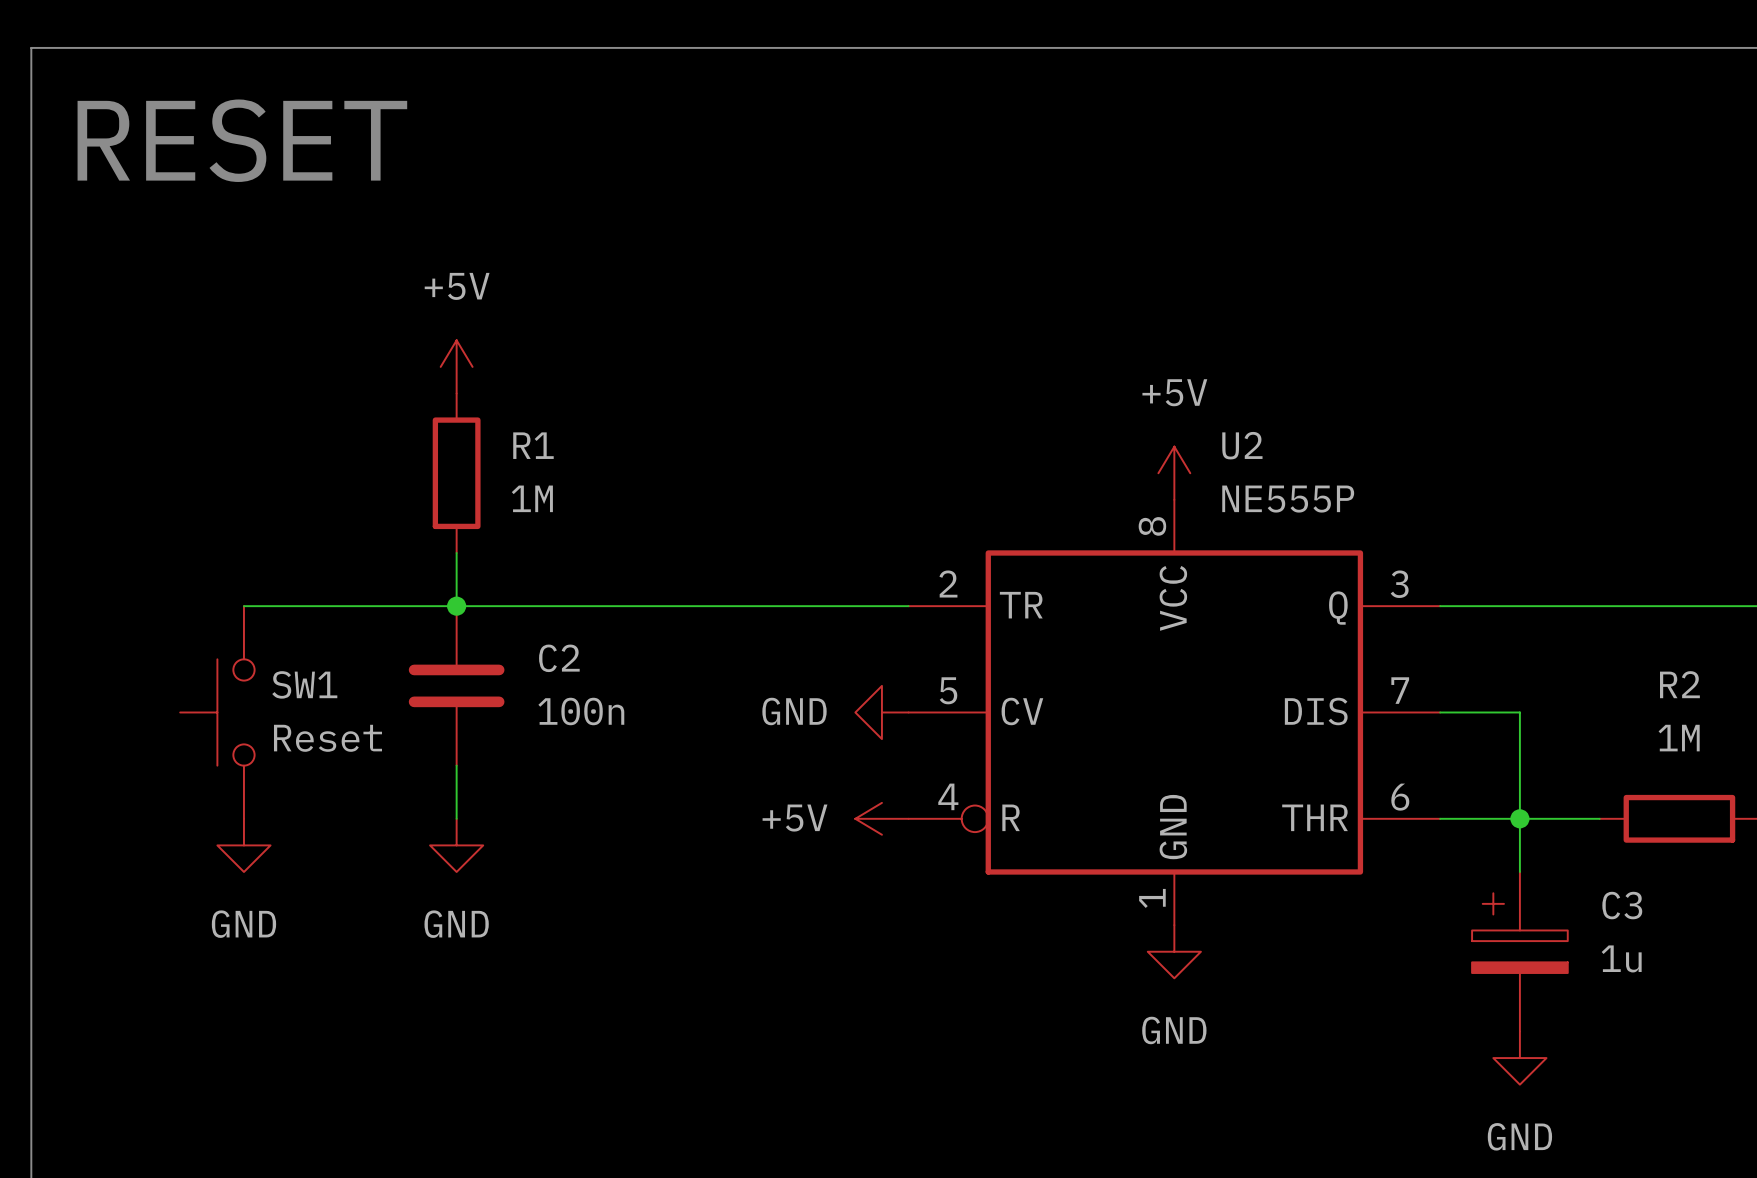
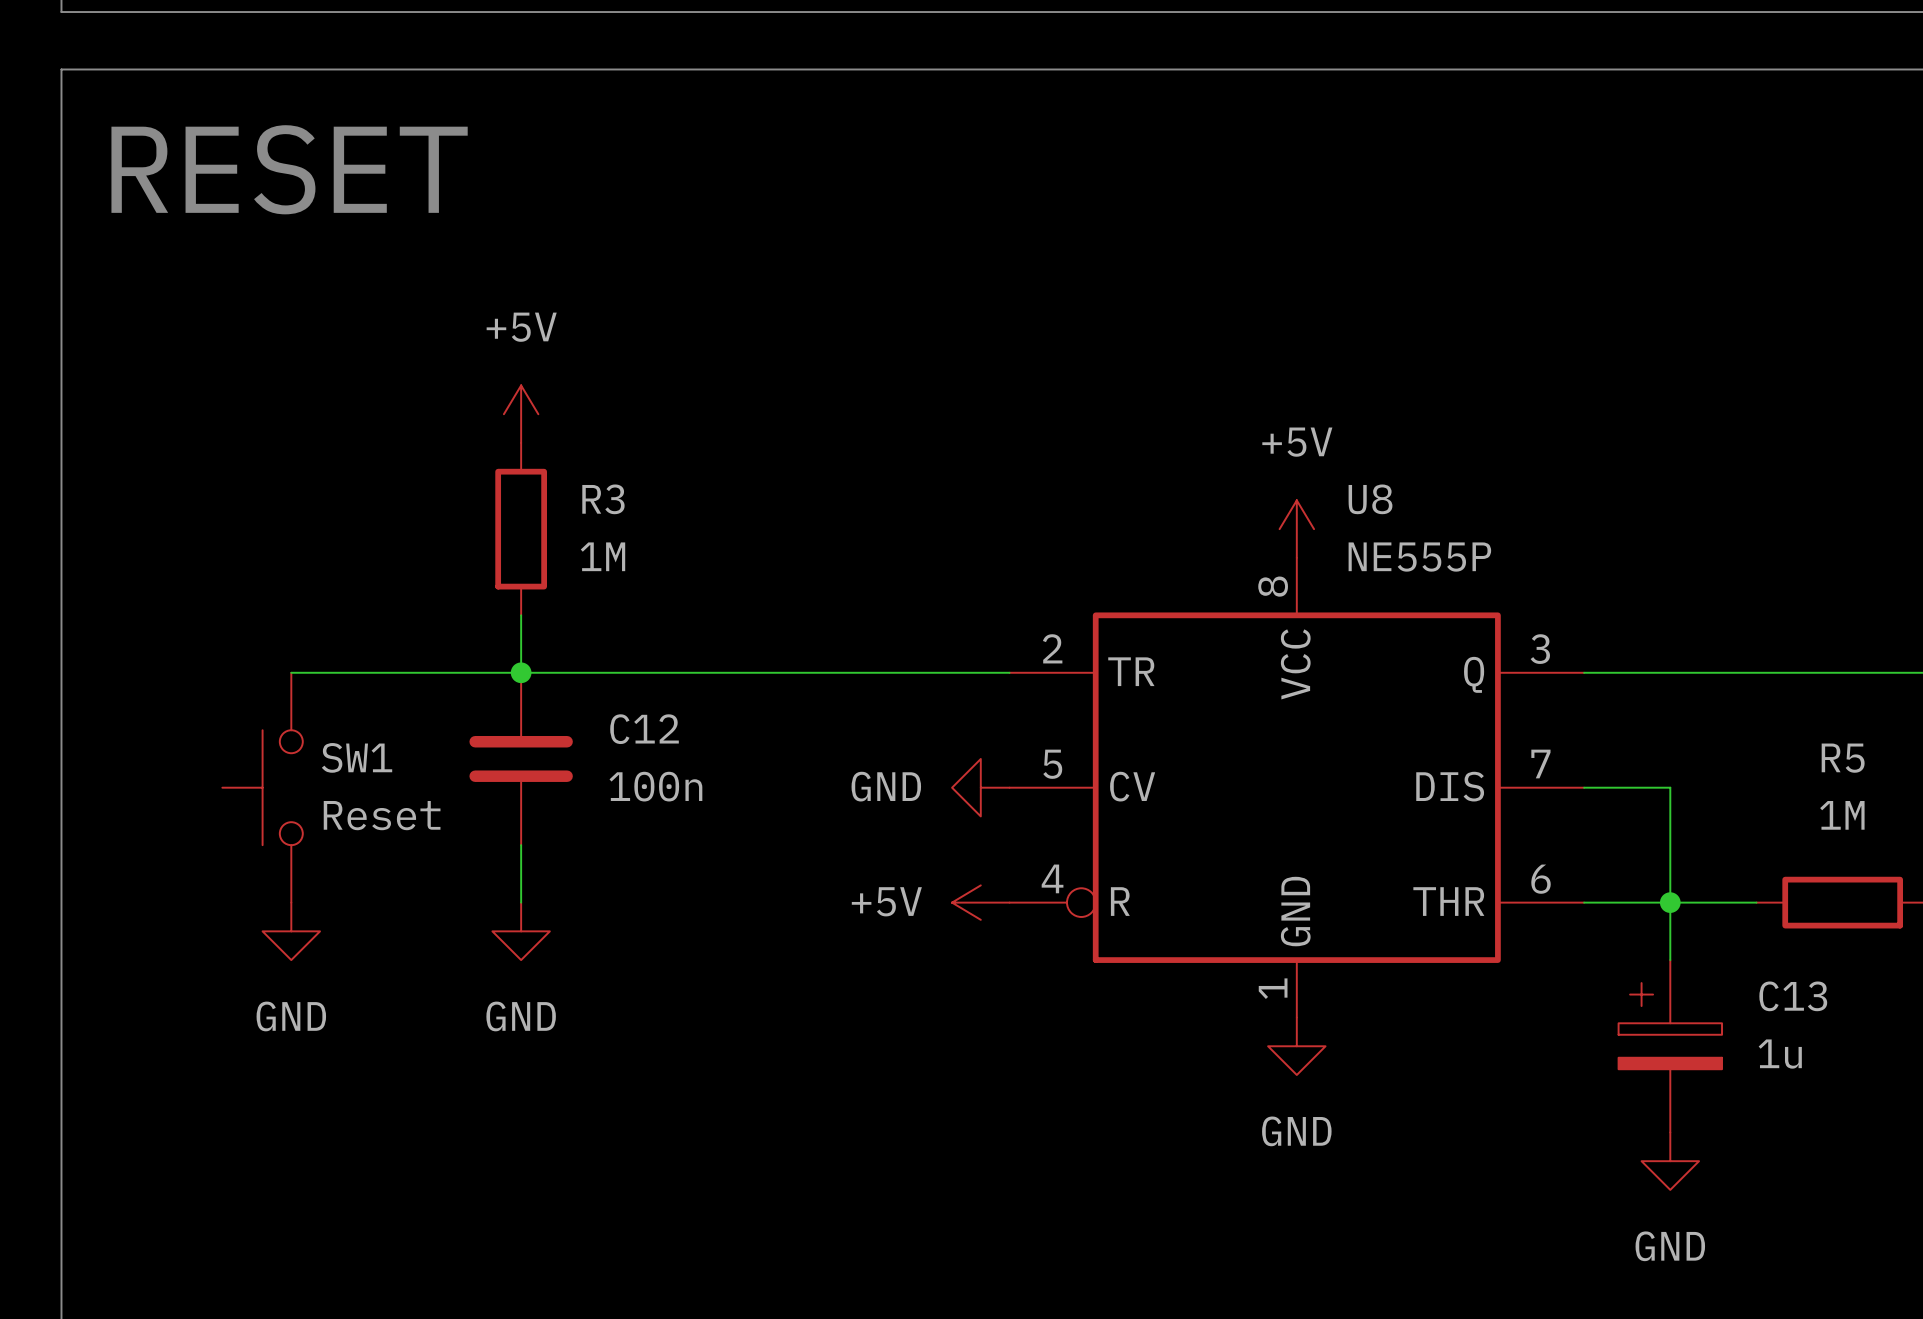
R1 name: R1 (533, 445) -> R3 (603, 499)
U2 name: U2 (1242, 445) -> U8 (1370, 499)
C2 name: C2 (559, 658) -> C12 (644, 729)
R2 name: R2 (1679, 684) -> R5 (1843, 758)
C3 name: C3 (1622, 905) -> C13 (1793, 996)

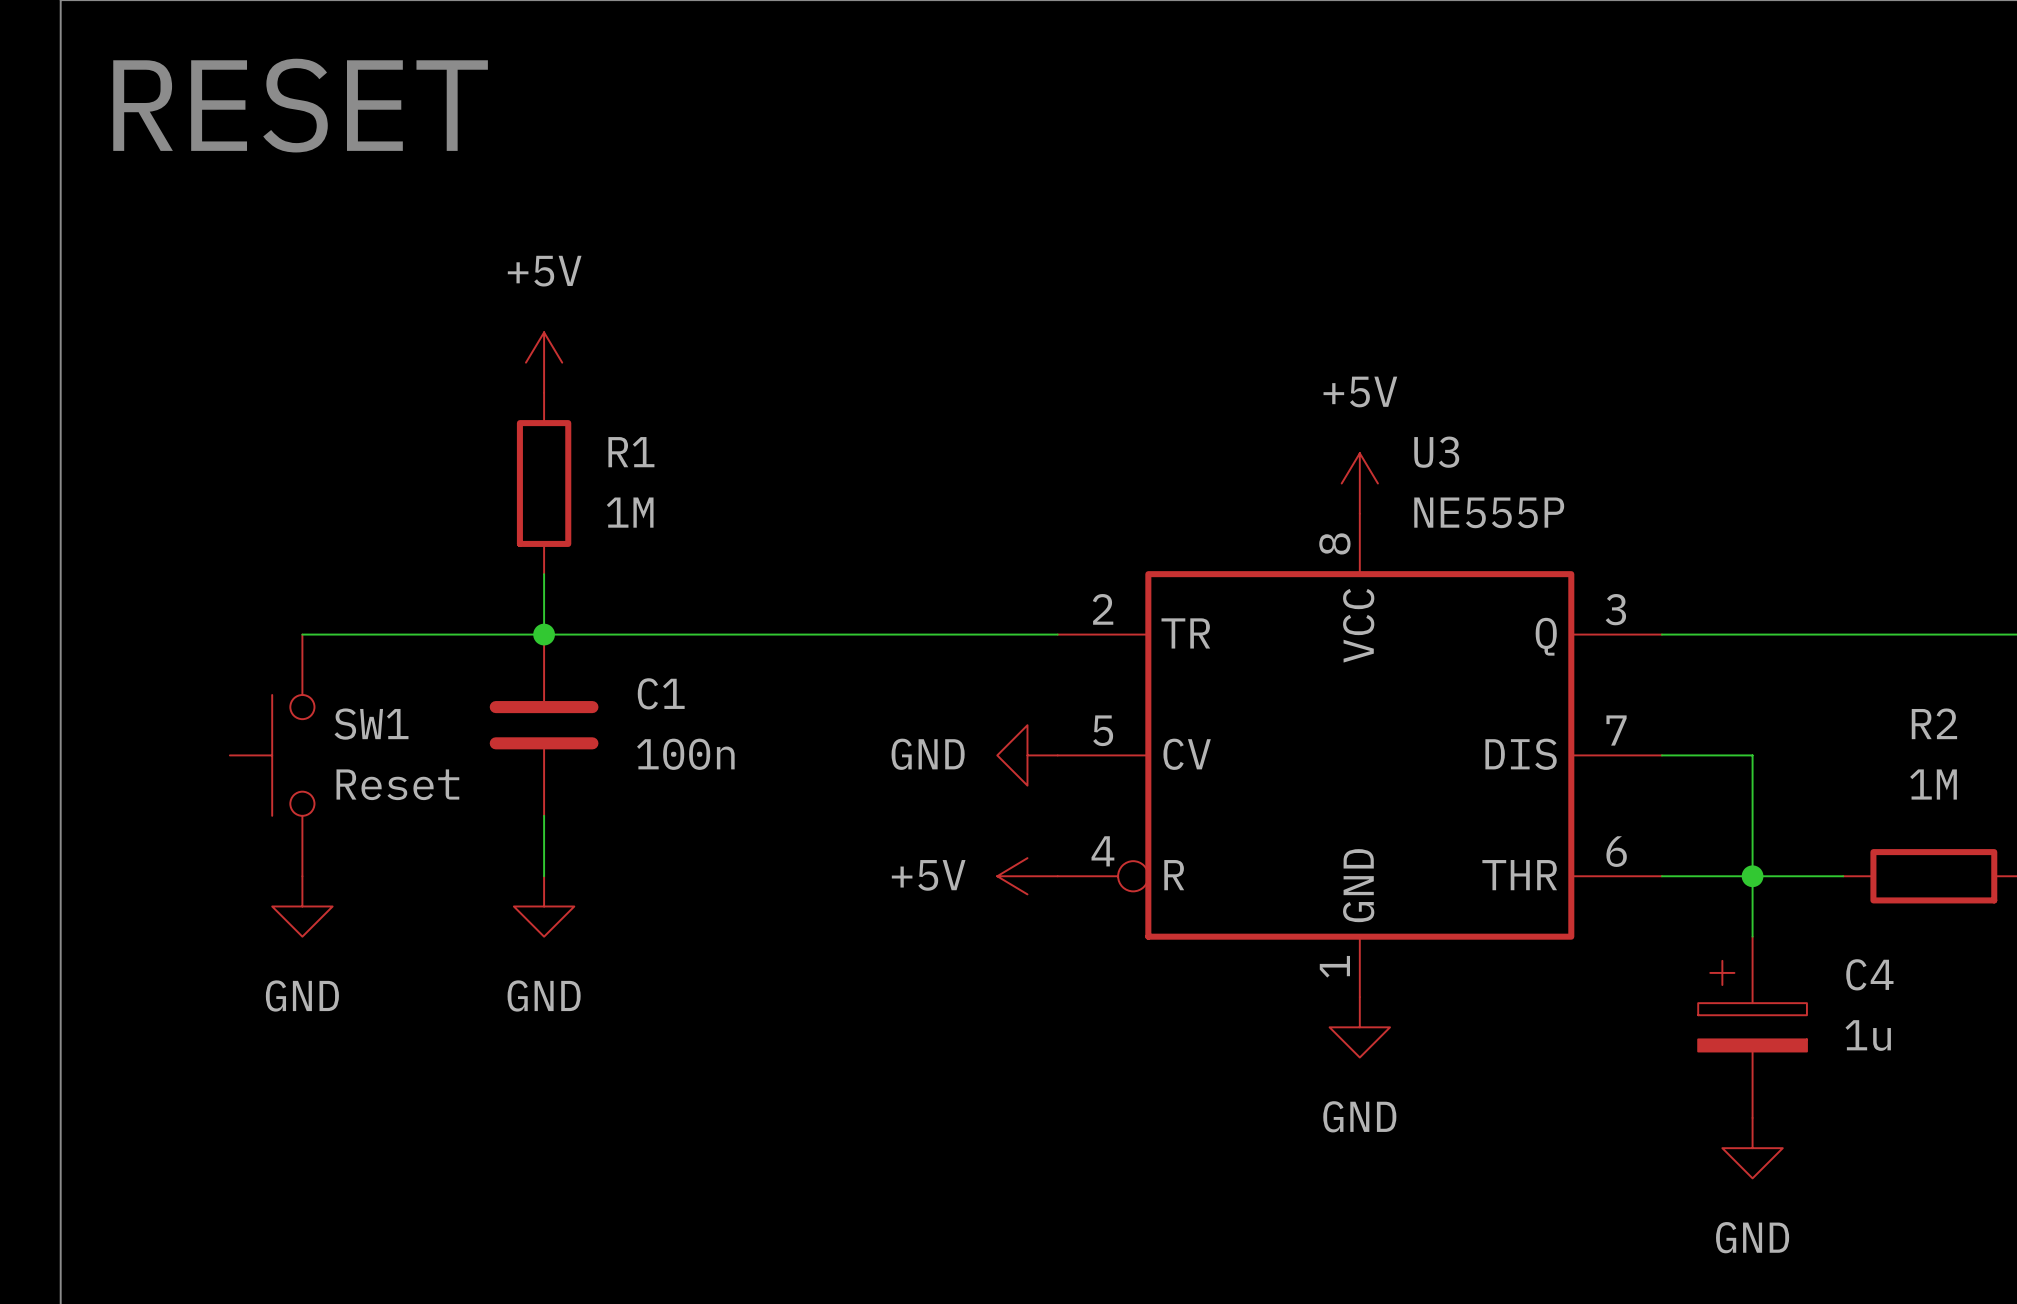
R3 name: R3 (603, 499) -> R1 (631, 452)
U8 name: U8 (1370, 499) -> U3 (1436, 452)
C12 name: C12 (644, 729) -> C1 (661, 693)
R5 name: R5 (1843, 758) -> R2 (1934, 723)
C13 name: C13 (1793, 996) -> C4 (1869, 974)

